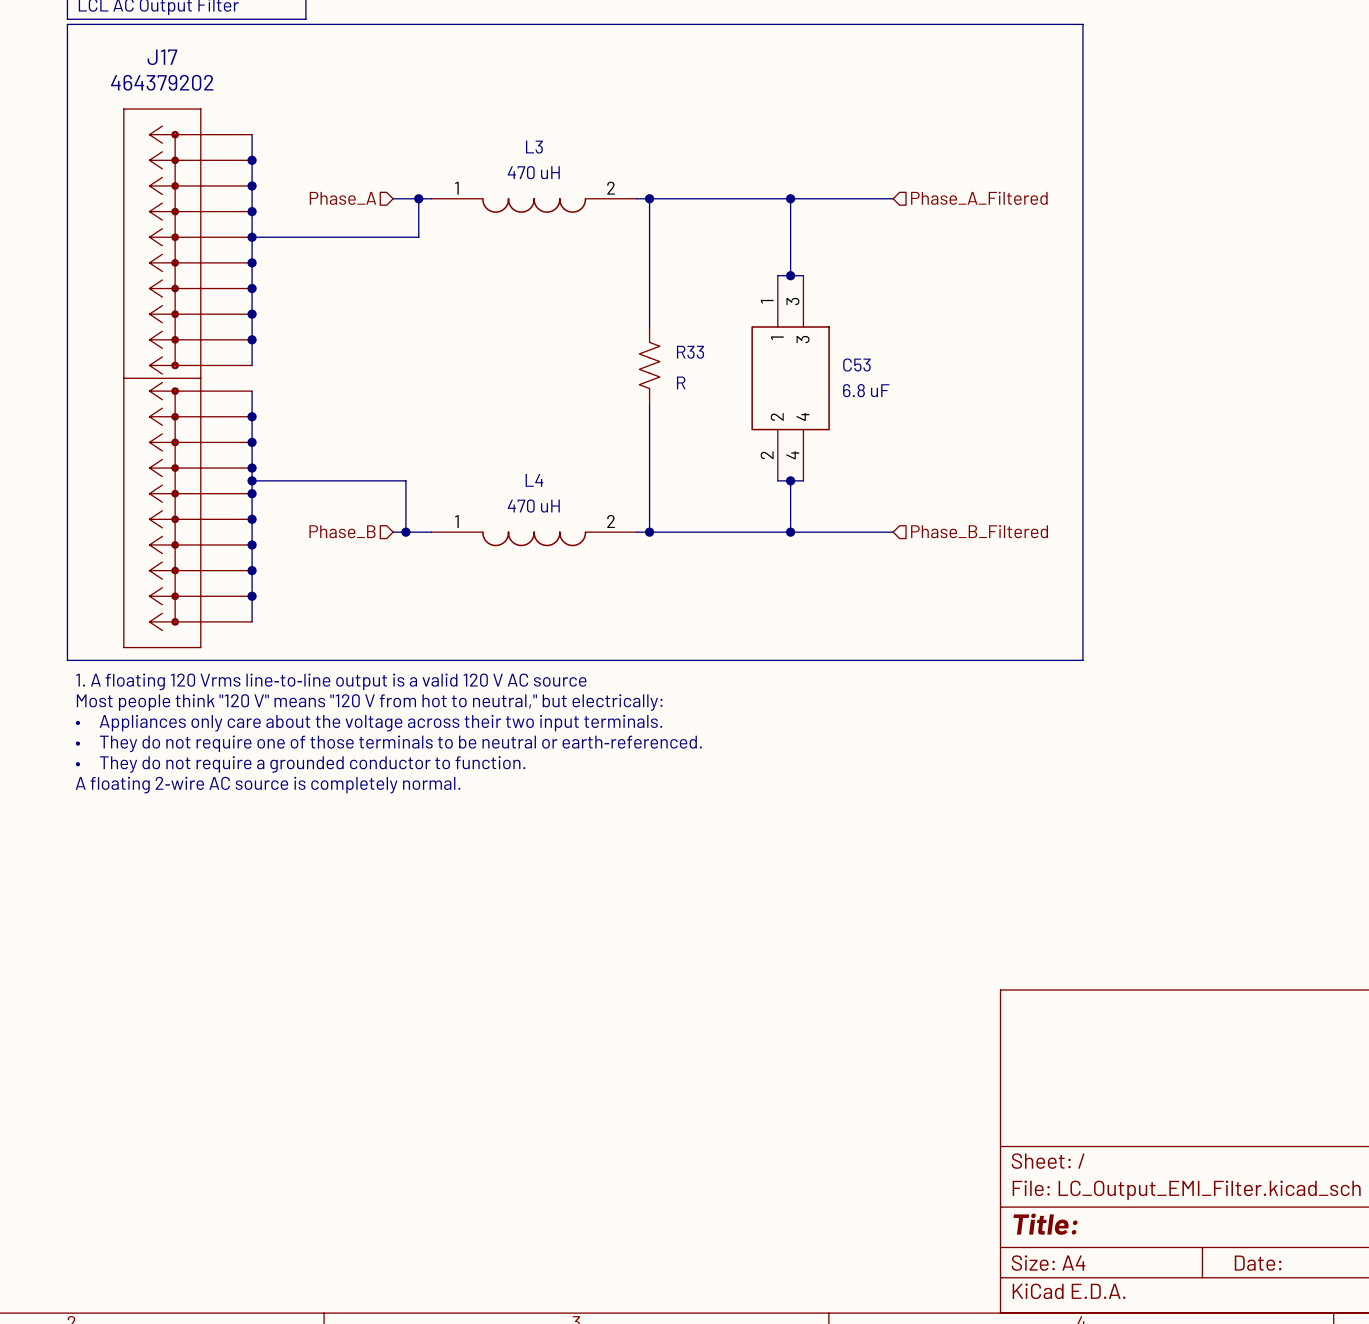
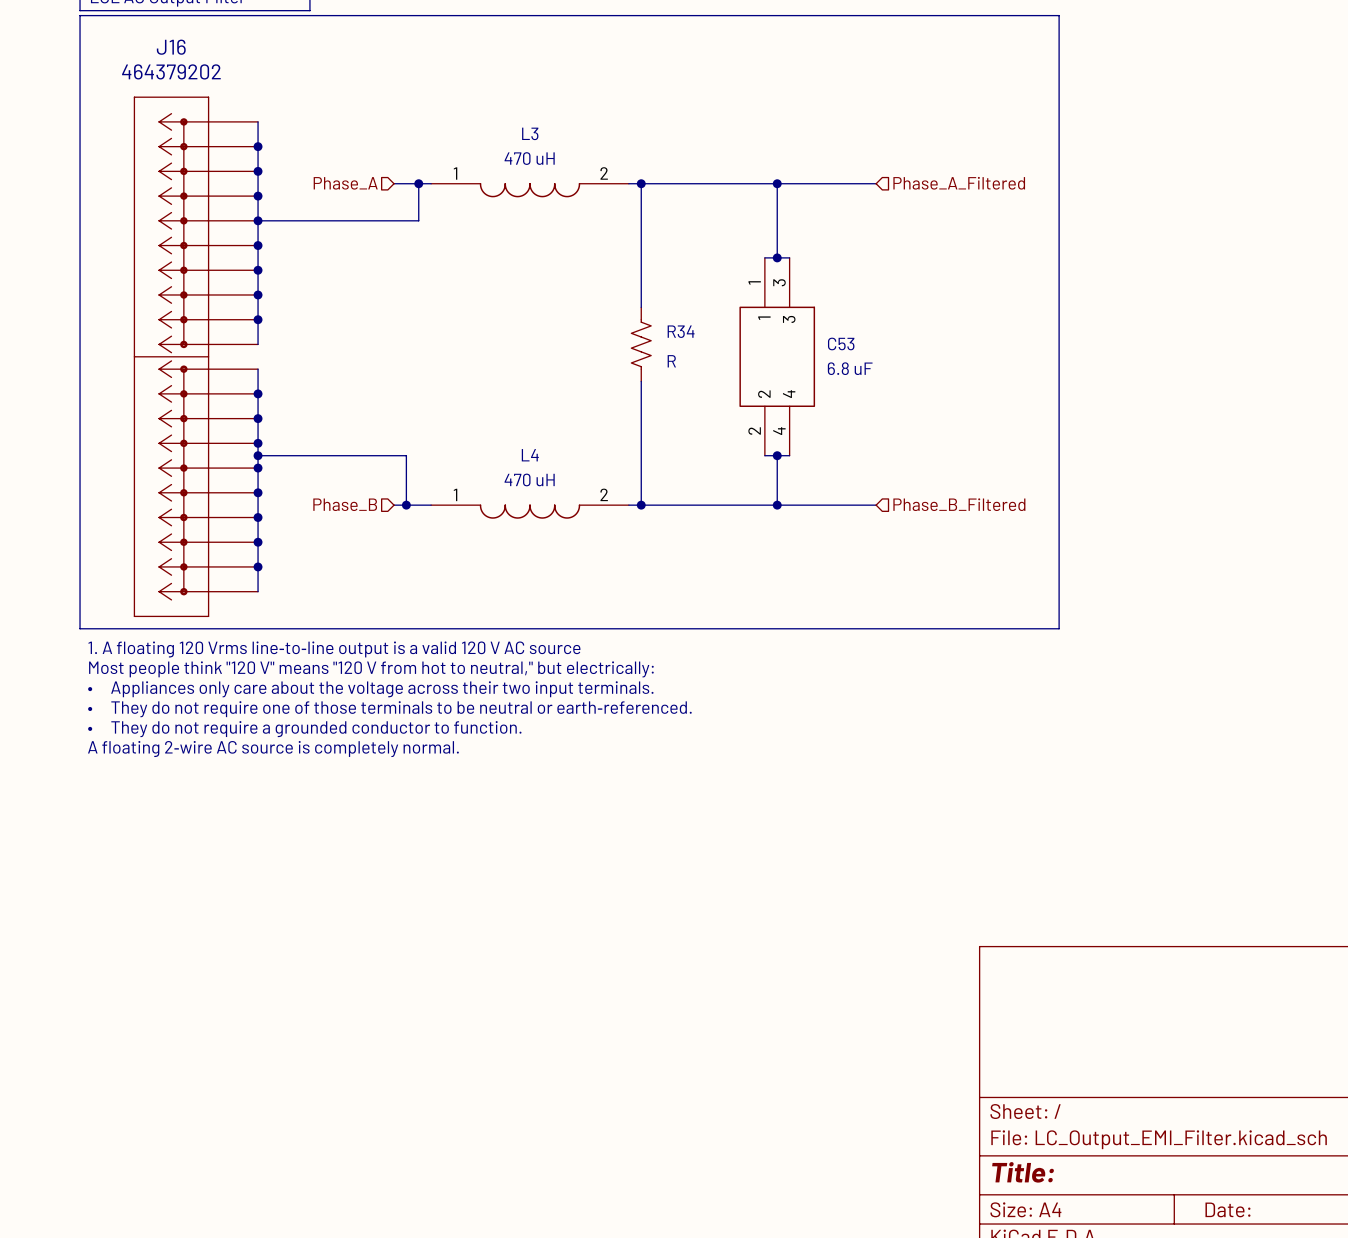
J17 name: J17 (162, 57) -> J16 (171, 47)
R33 name: R33 (690, 352) -> R34 (681, 331)

